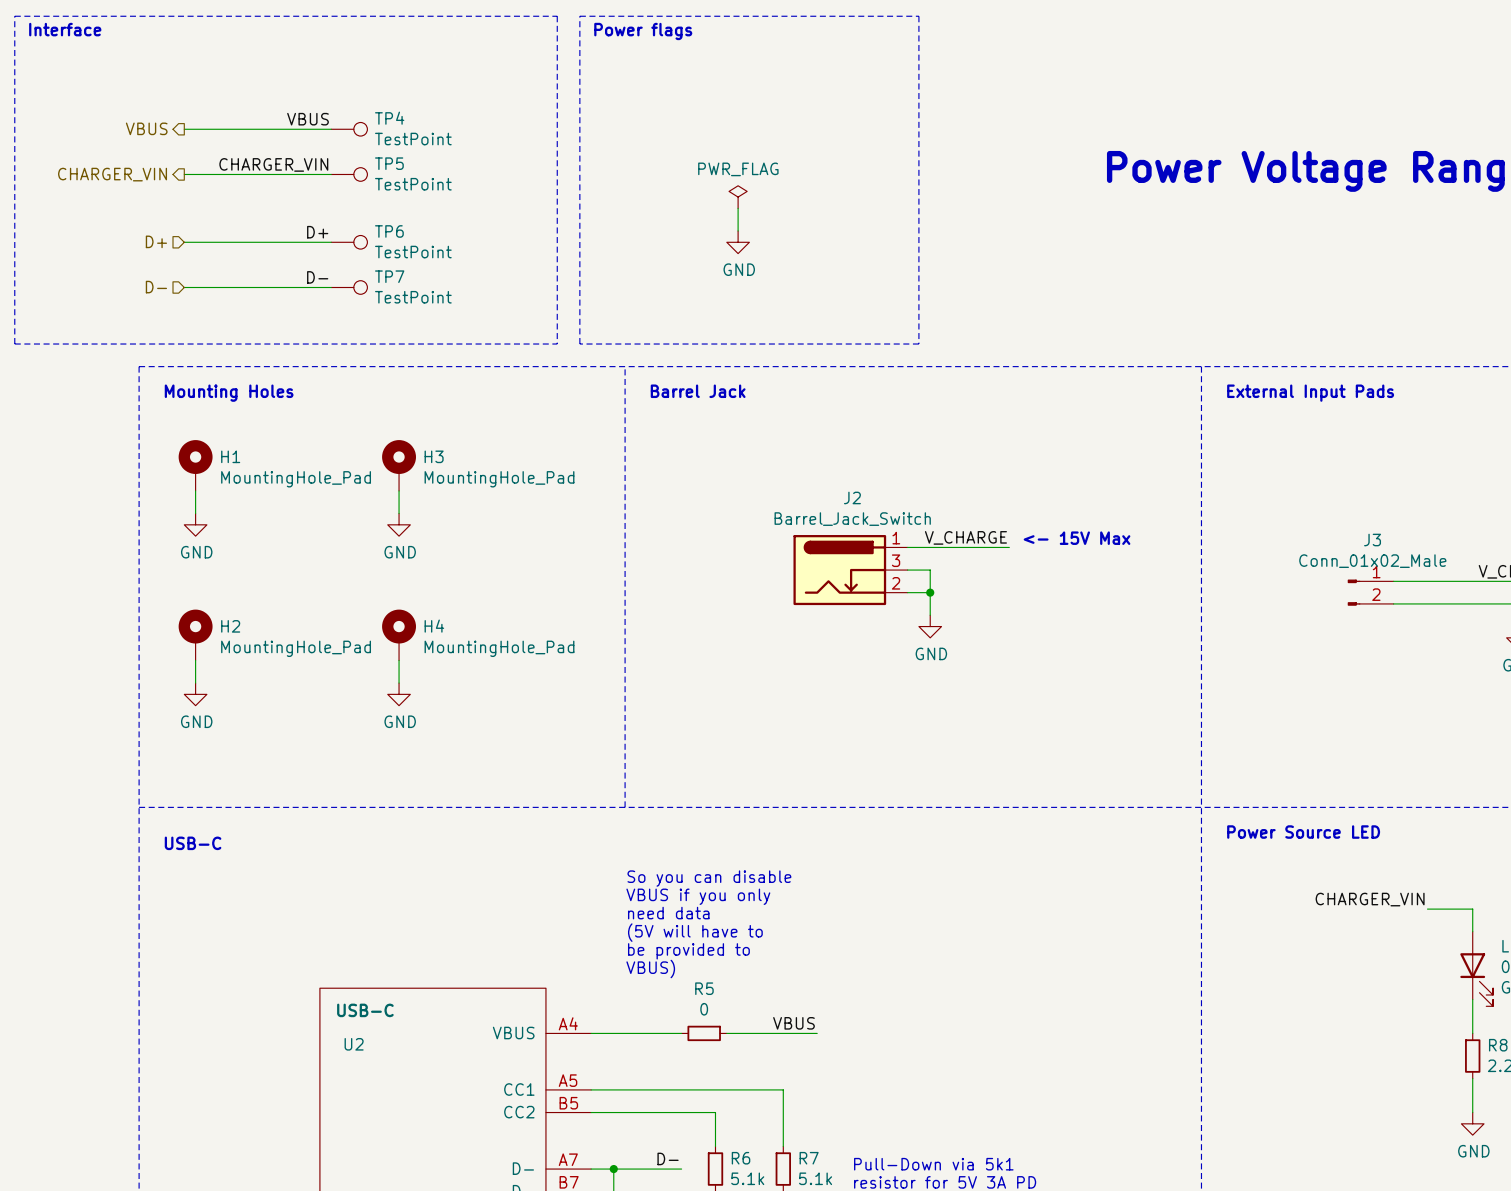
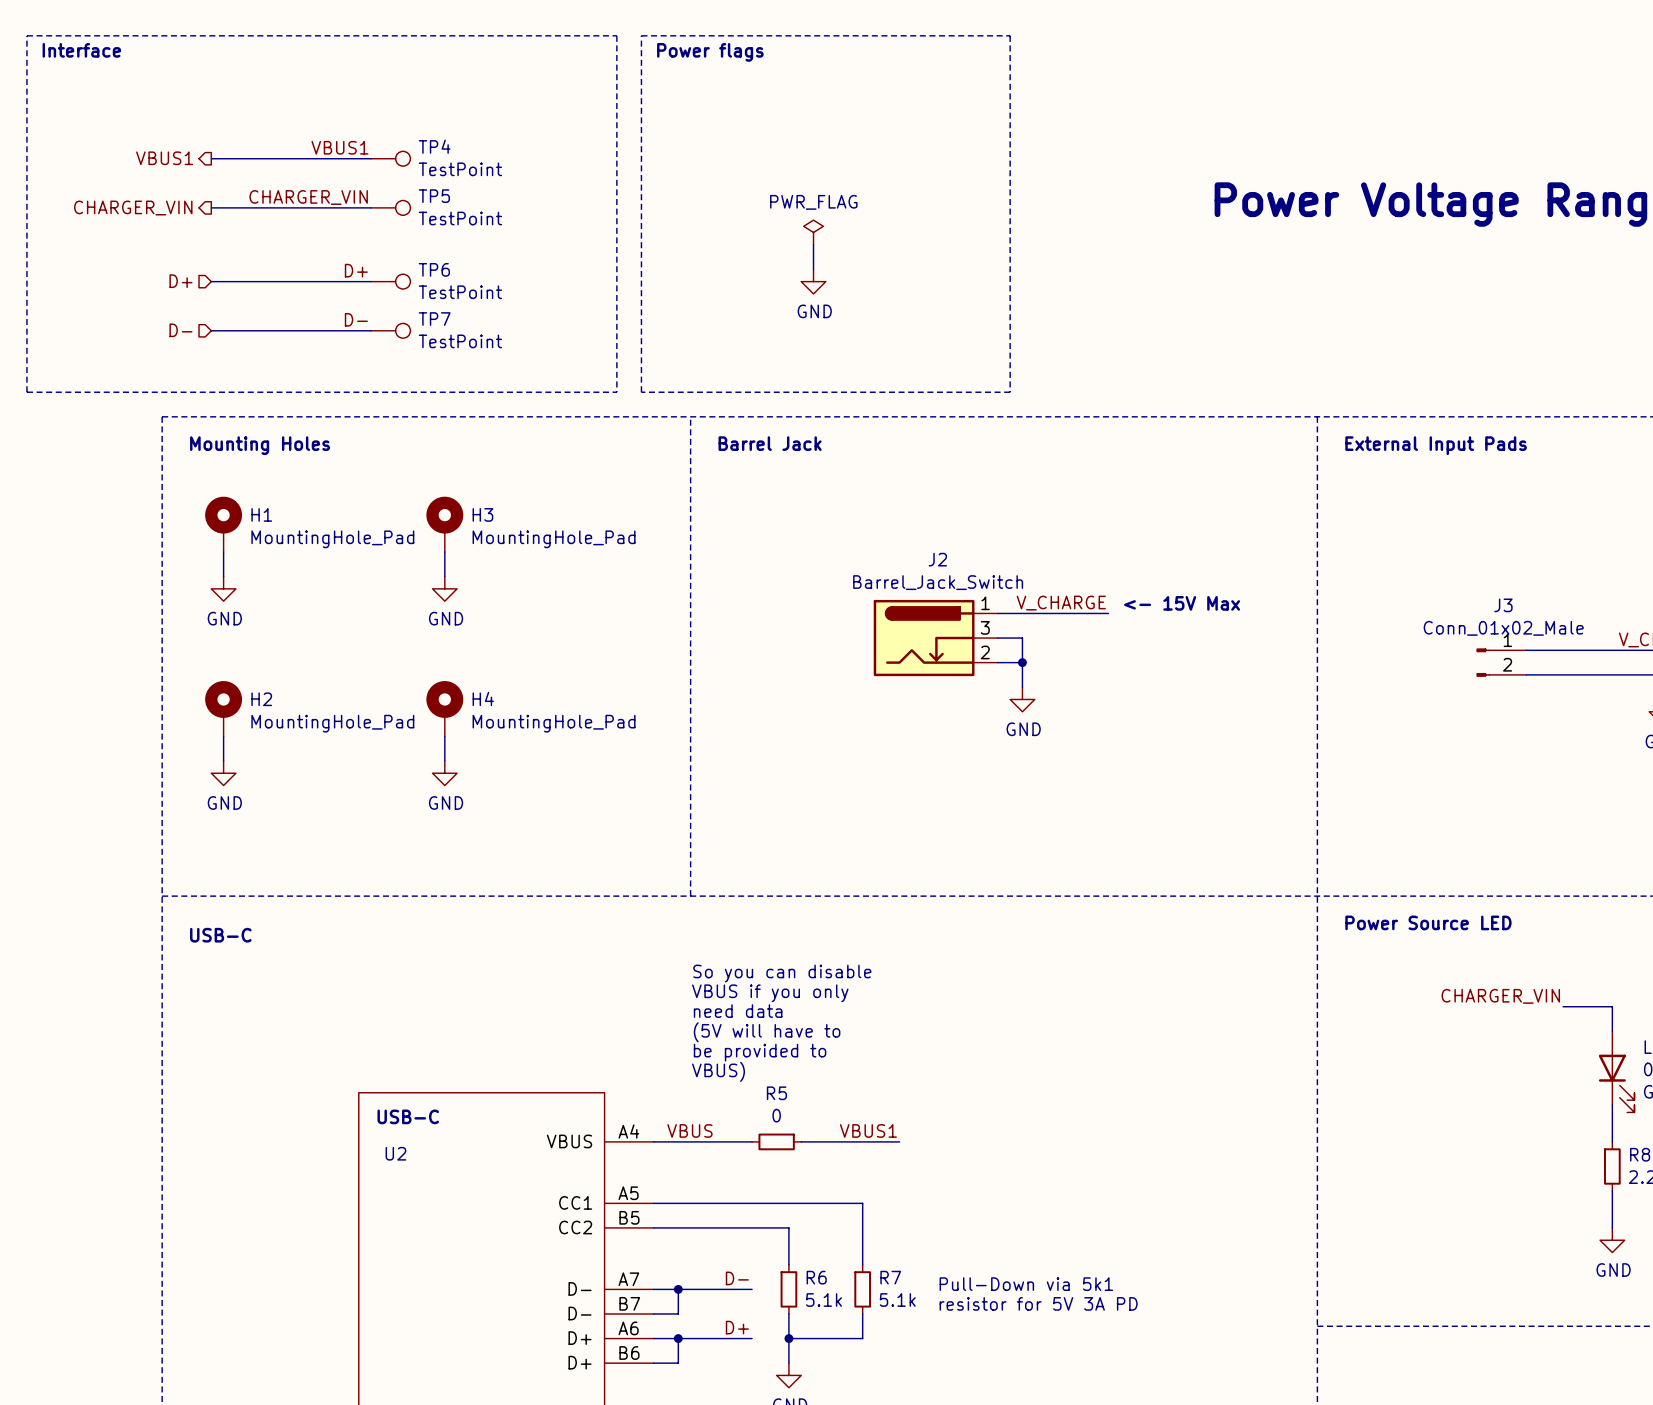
label: VBUS (308, 119) -> VBUS1 (339, 147)
hierarchical label: VBUS (146, 128) -> VBUS1 (164, 158)
label: none -> VBUS (689, 1130)
label: VBUS (793, 1023) -> VBUS1 (868, 1130)

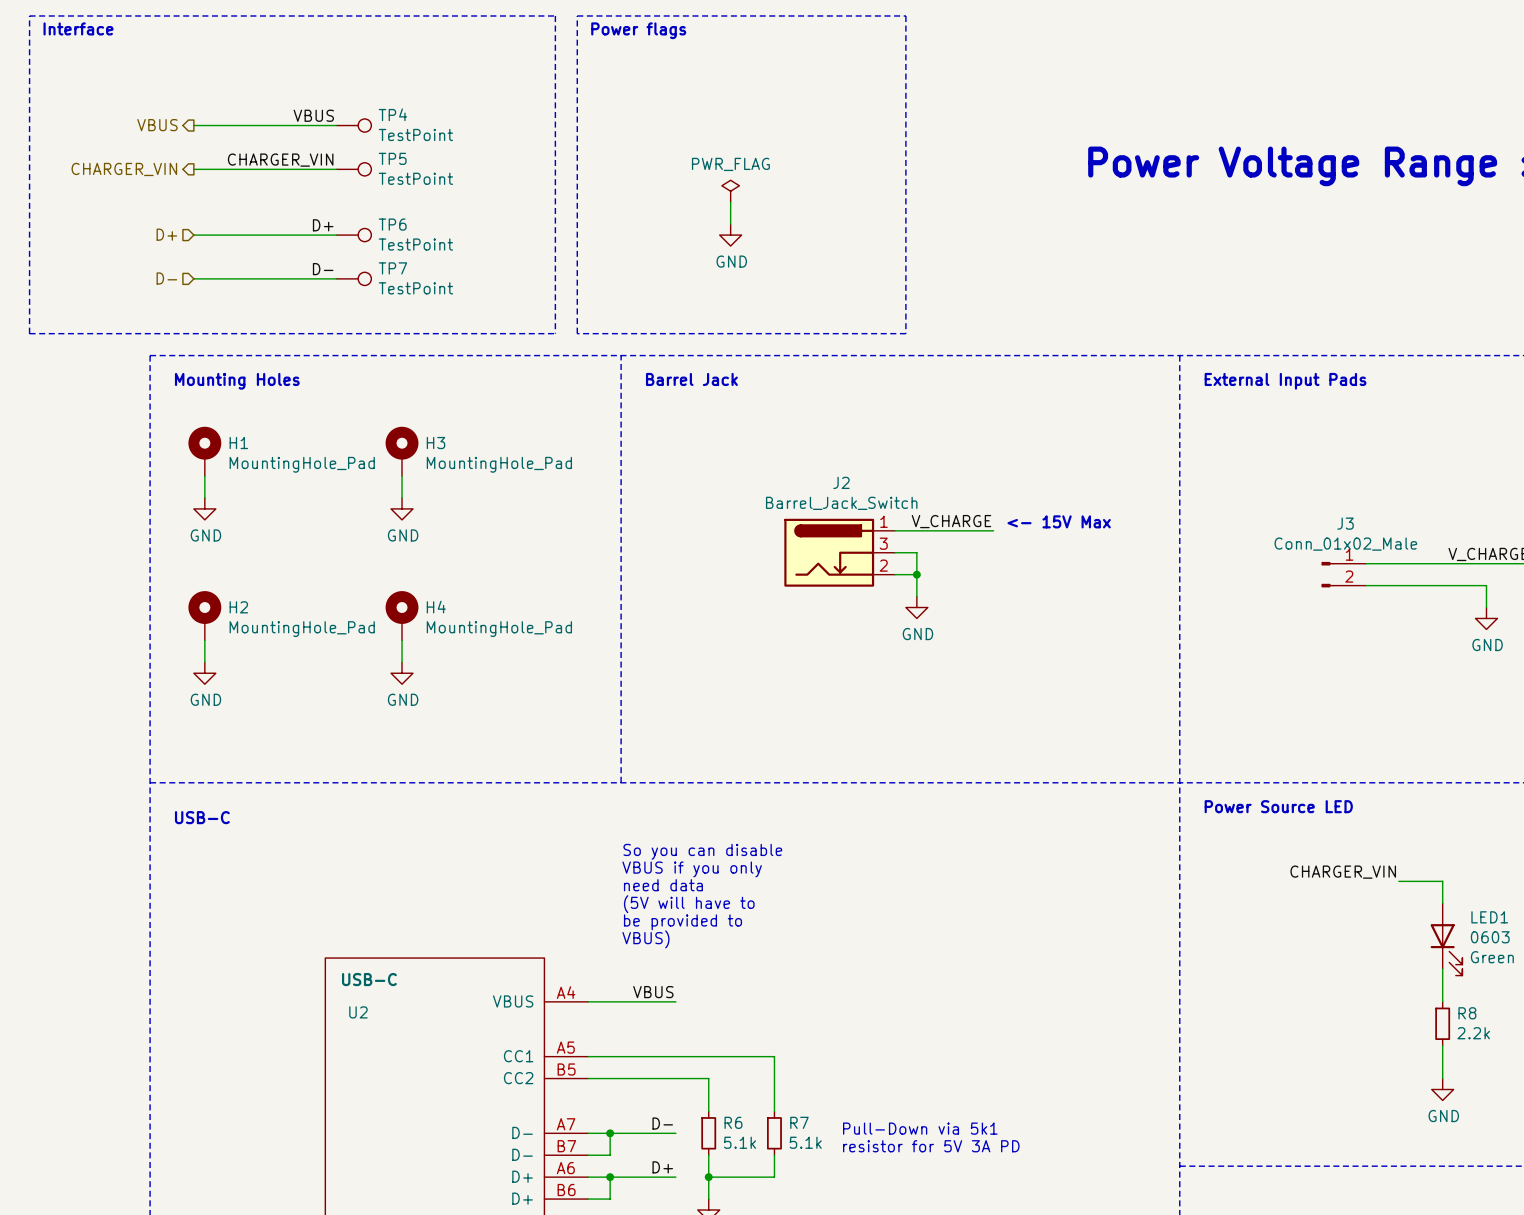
label: VBUS1 (339, 147) -> VBUS (313, 115)
hierarchical label: VBUS1 (164, 158) -> VBUS (157, 125)
label position: VBUS (689, 1130) -> VBUS (653, 992)
label: VBUS1 (868, 1130) -> none
R5: 0 (776, 1141) -> none
wire: (801, 1141) (899, 1141) -> none

